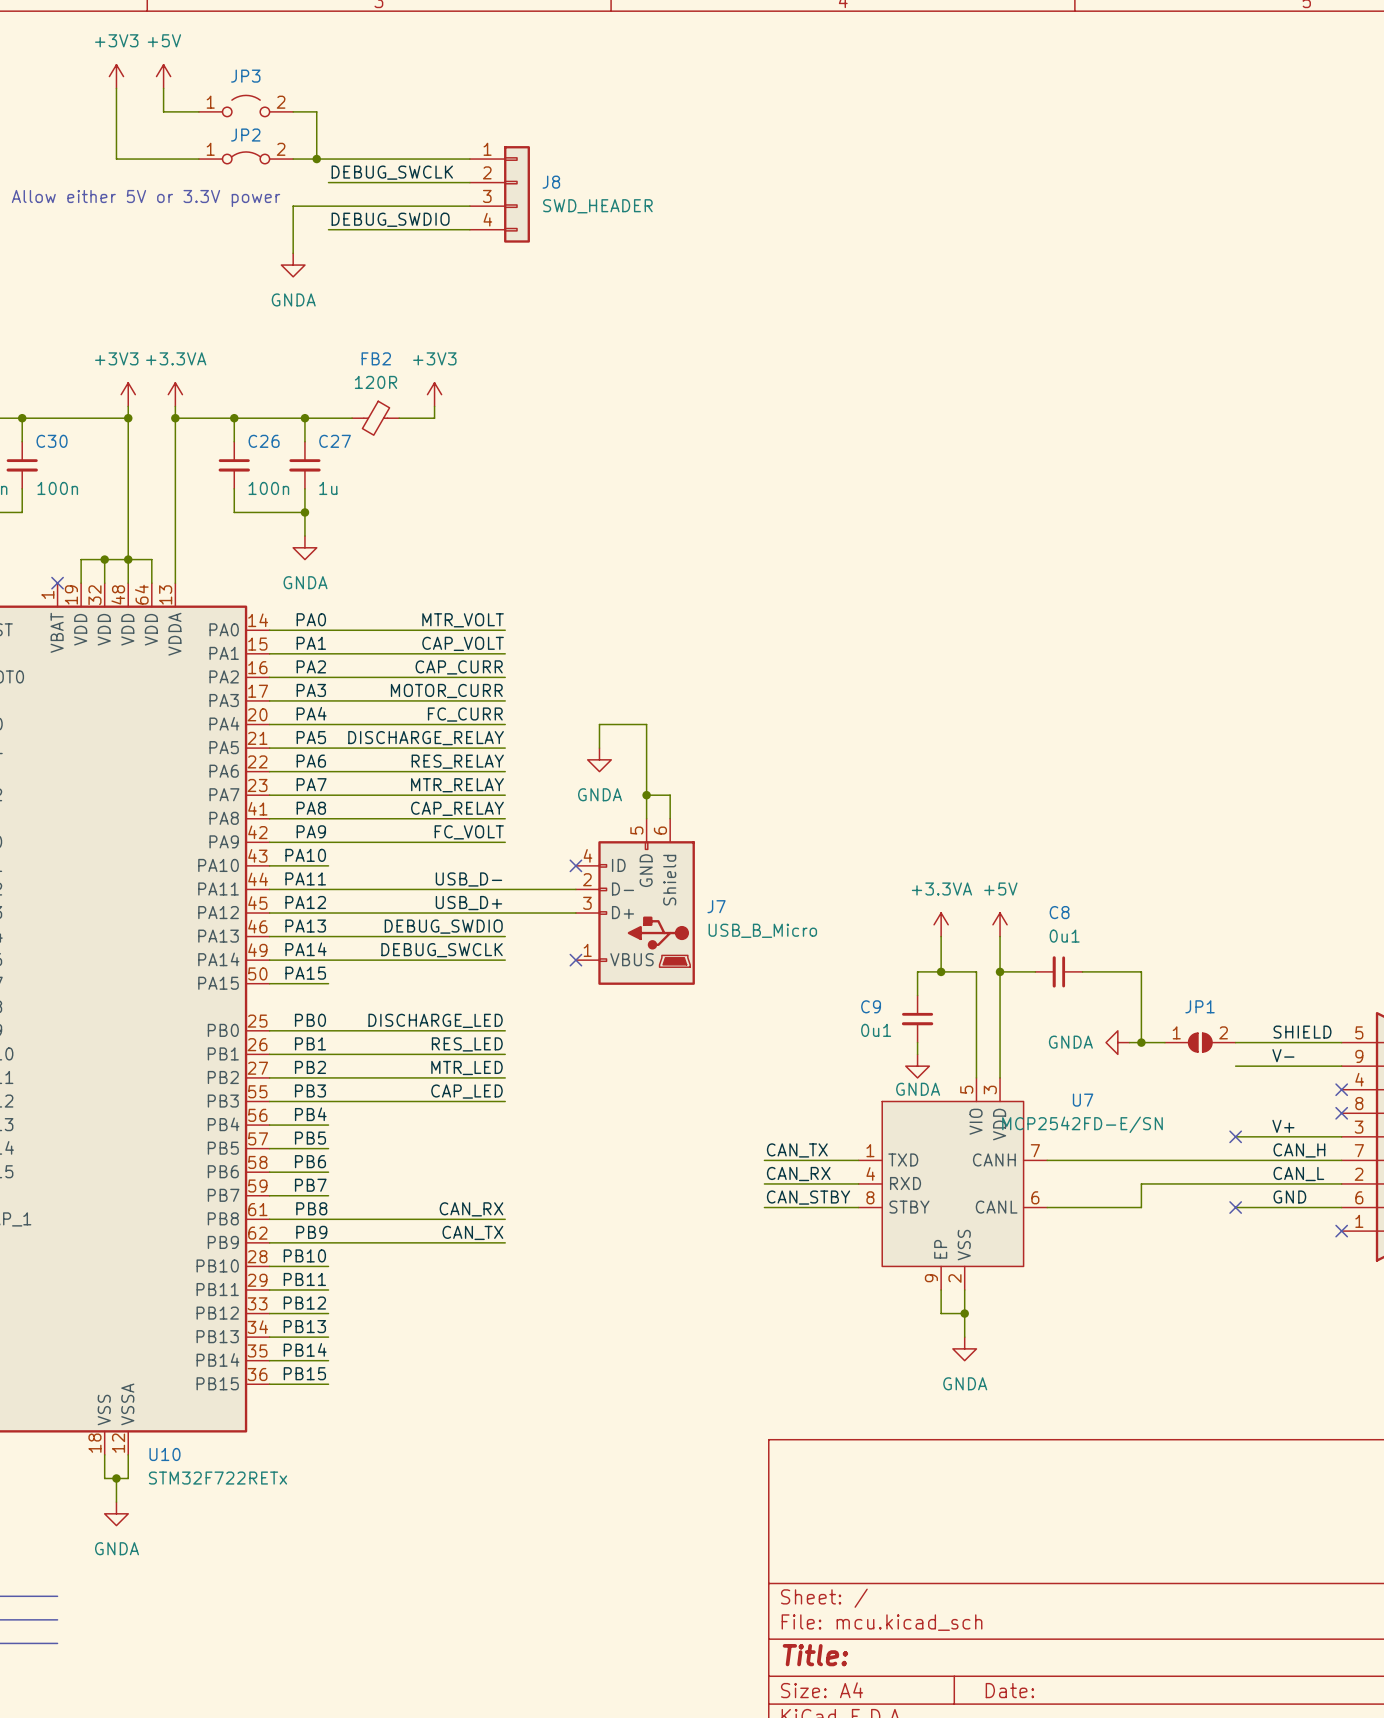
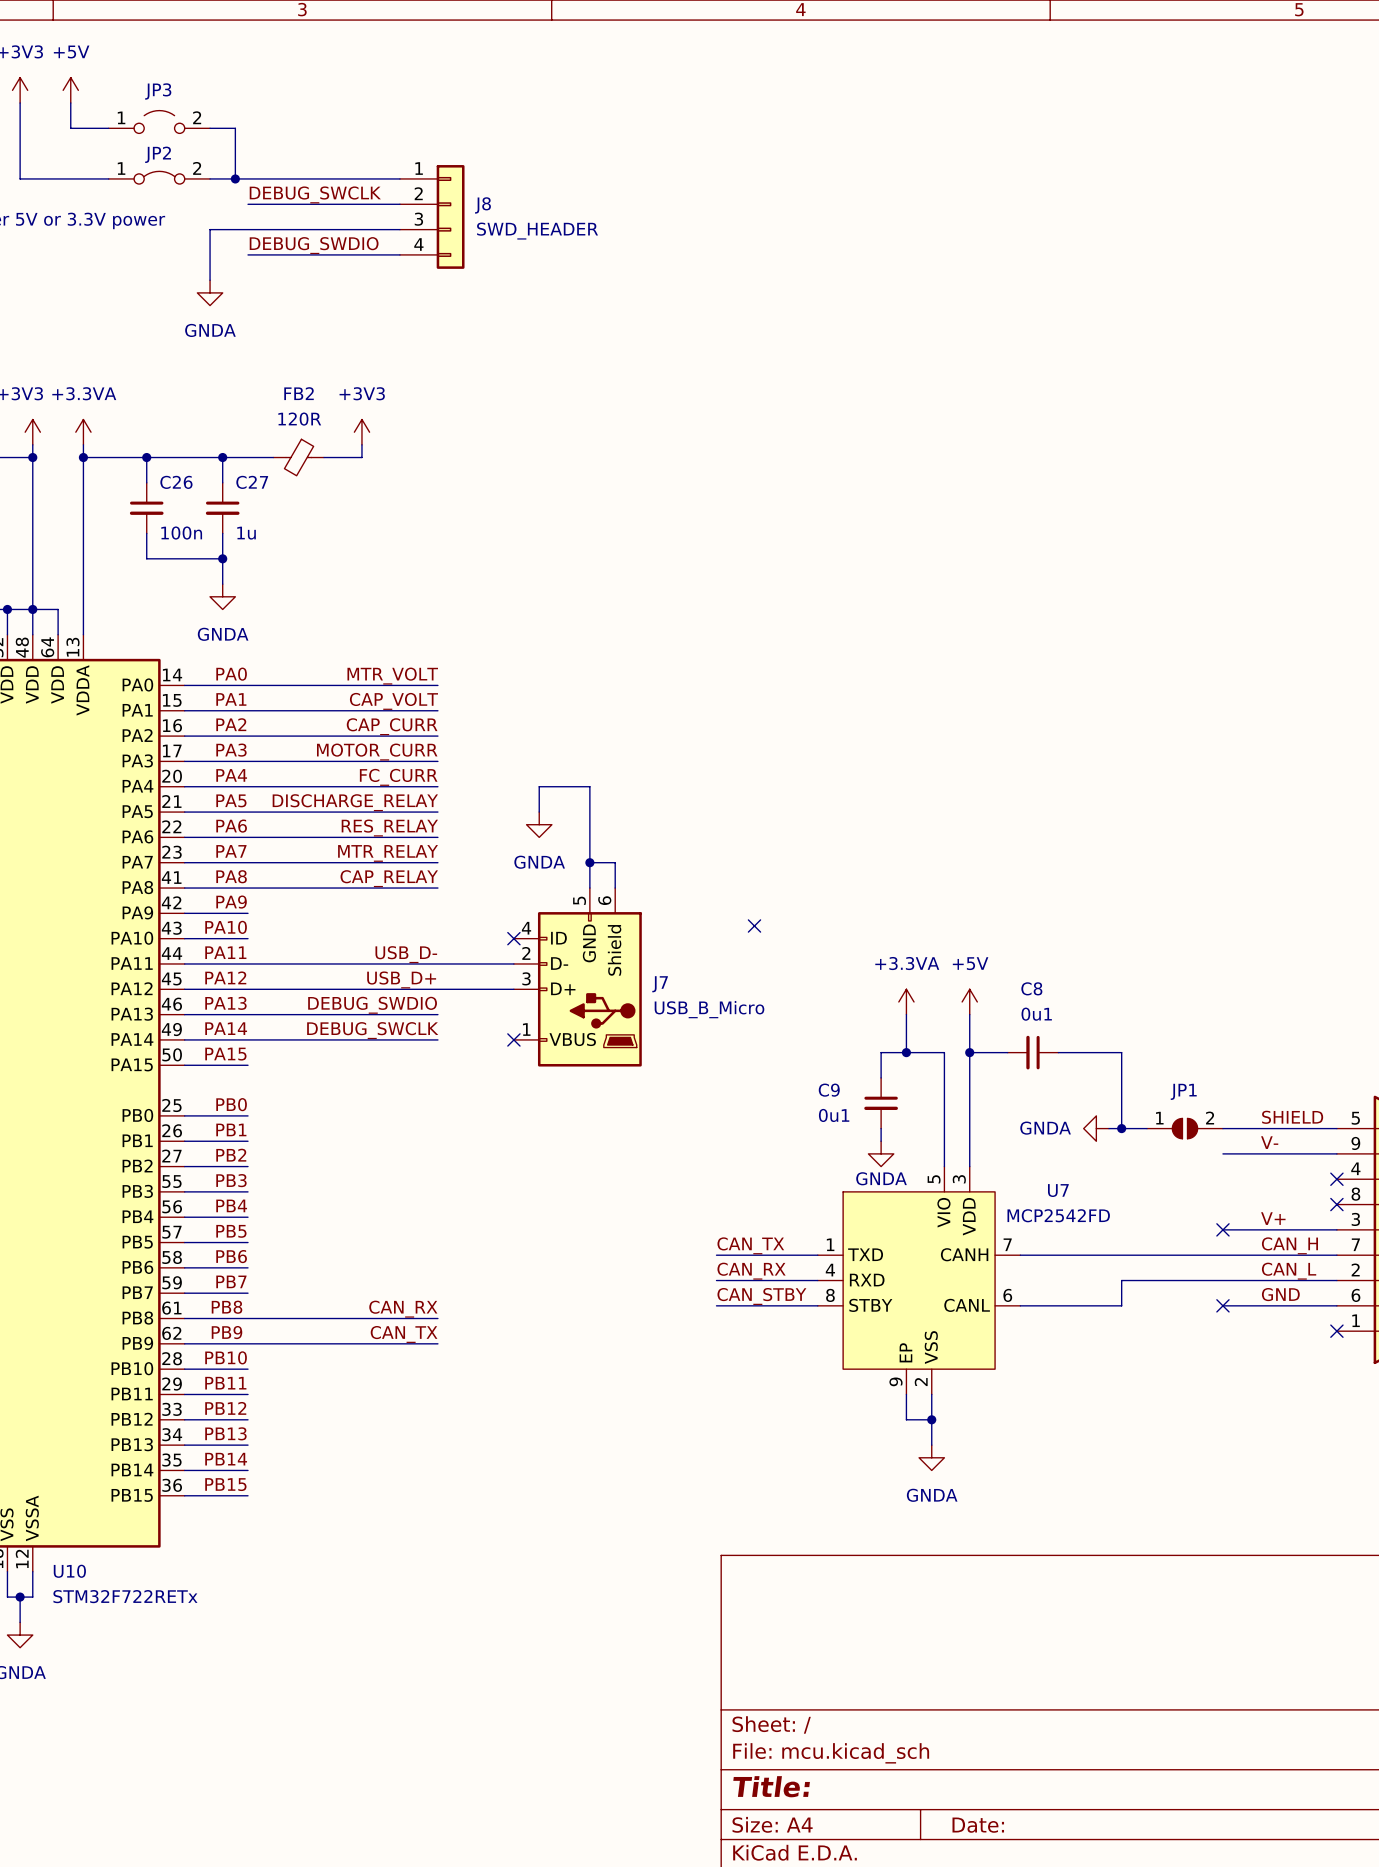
label: FC_VOLT (469, 832) -> none
wire: (328, 842) (505, 842) -> none
no-connect mark: none -> (754, 926)
label: DISCHARGE_LED (435, 1020) -> none
wire: (328, 1030) (505, 1030) -> none
label: RES_LED (467, 1044) -> none
wire: (328, 1054) (505, 1054) -> none
label: MTR_LED (466, 1067) -> none
wire: (328, 1077) (505, 1077) -> none
label: CAP_LED (466, 1091) -> none
wire: (328, 1101) (505, 1101) -> none
U7 value: MCP2542FD-E/SN (1082, 1124) -> MCP2542FD (1058, 1215)

